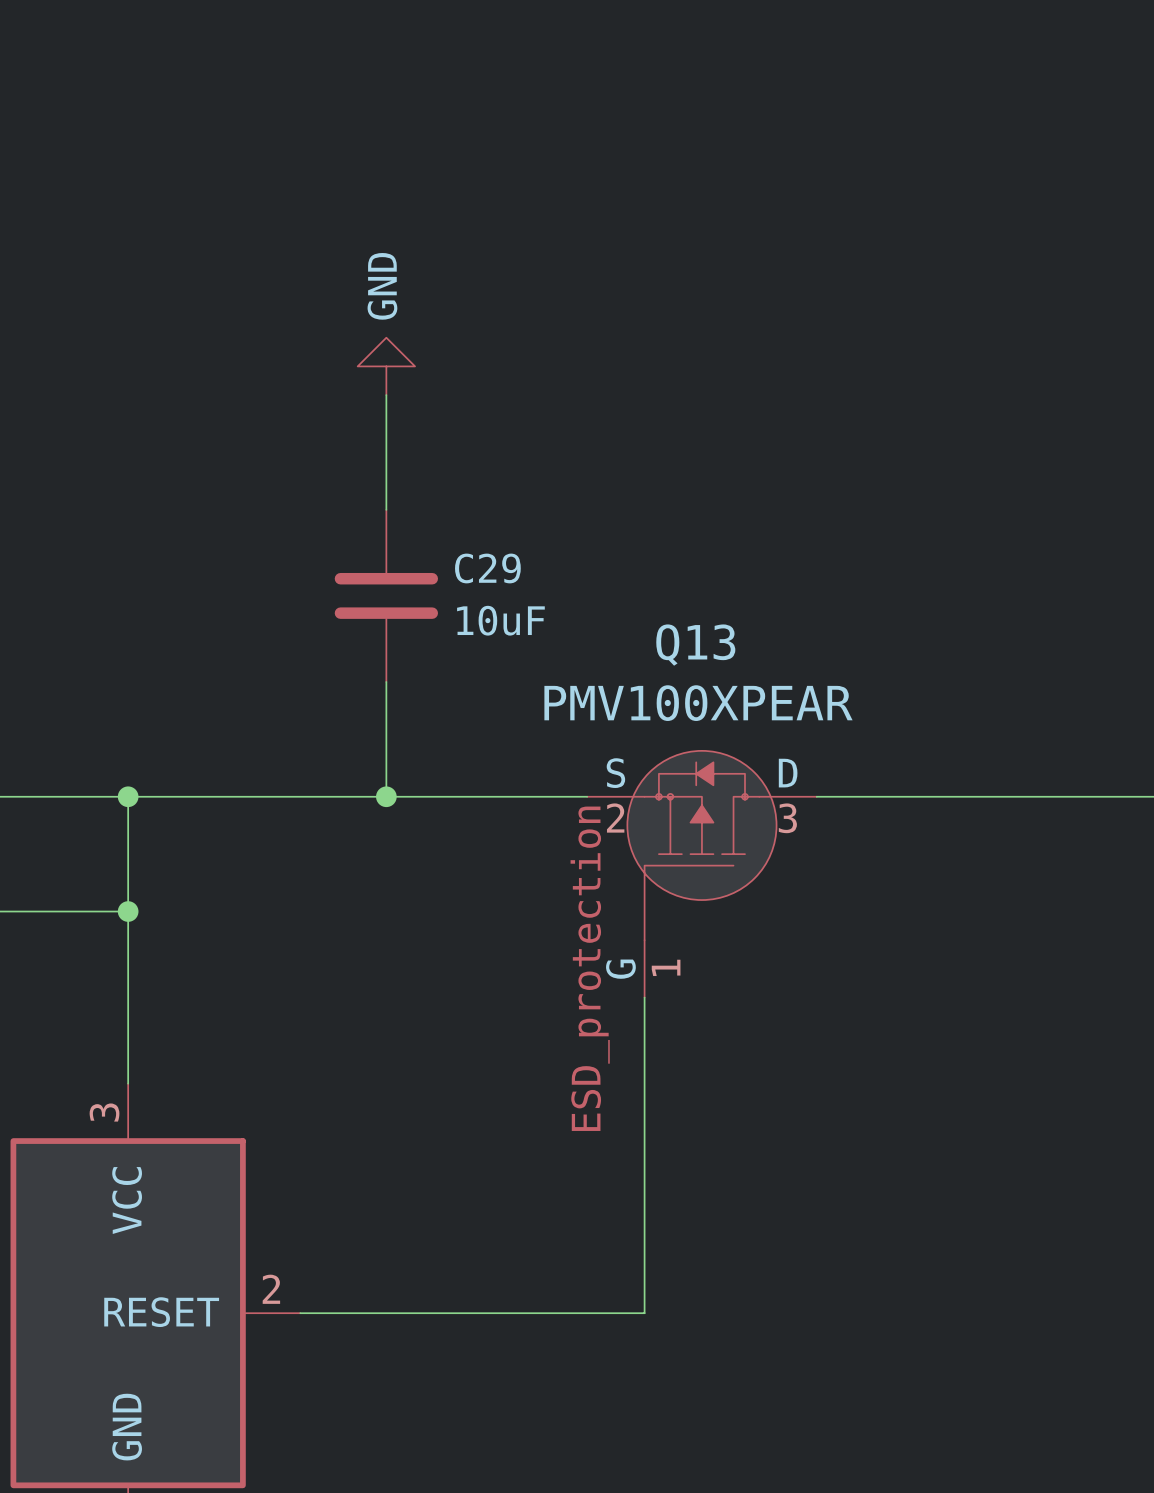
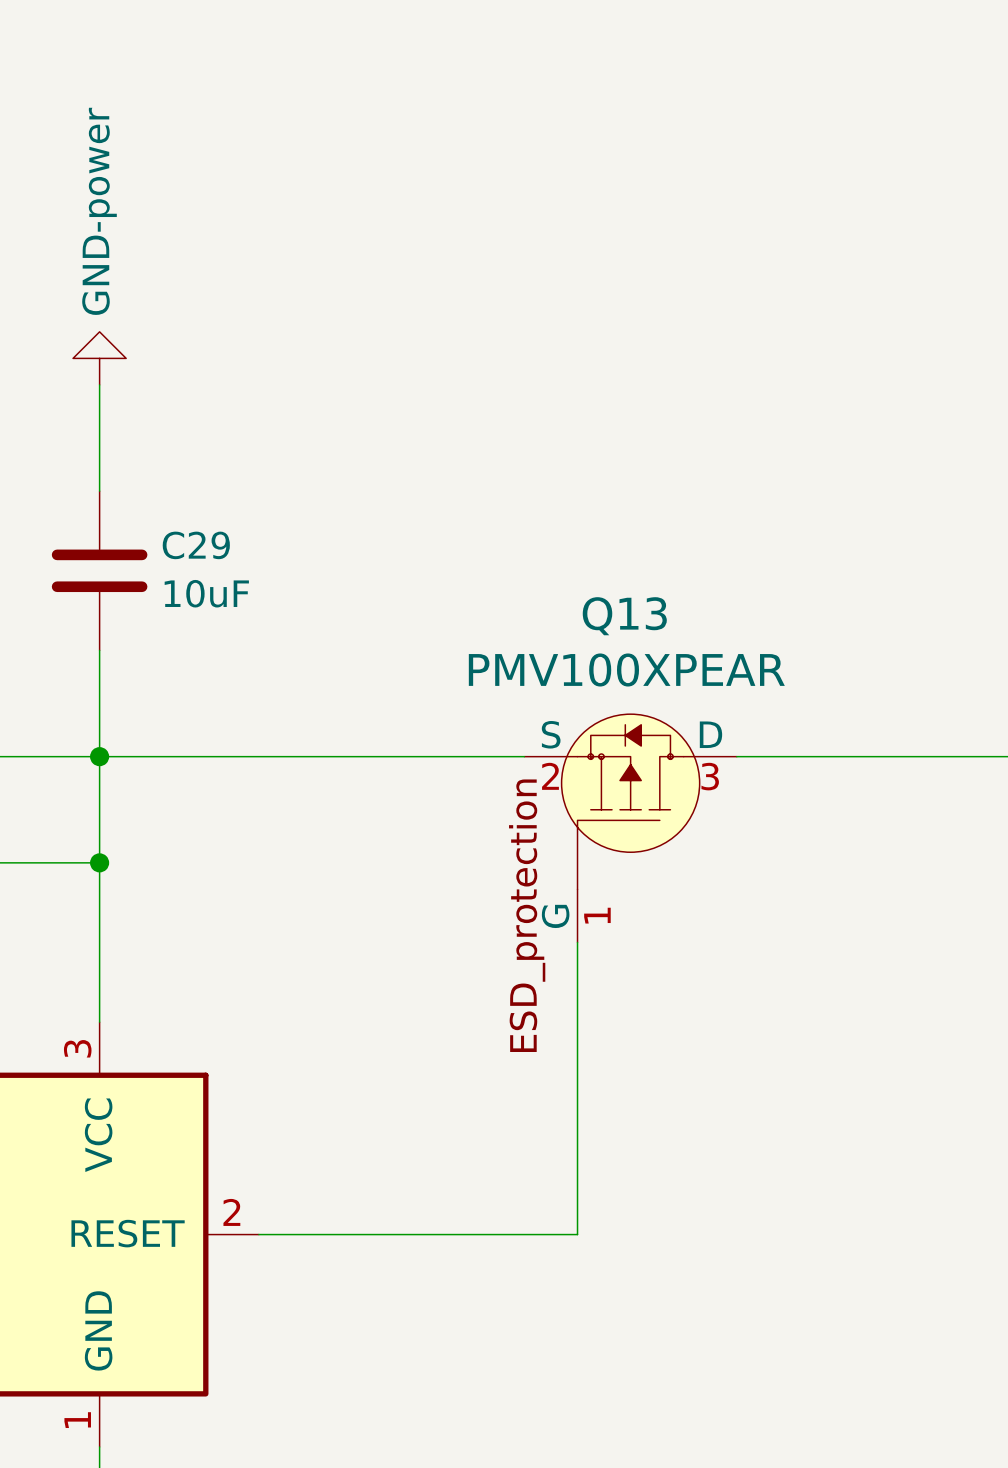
power symbol: none -> GND-power (99, 358)
power symbol: GND (386, 366) -> none
wire: (386, 395) (386, 509) -> (99, 384) (99, 491)
C29 position: (386, 595) -> (99, 570)
wire: (386, 682) (386, 796) -> (99, 650) (99, 756)
junction: (386, 796) -> none

